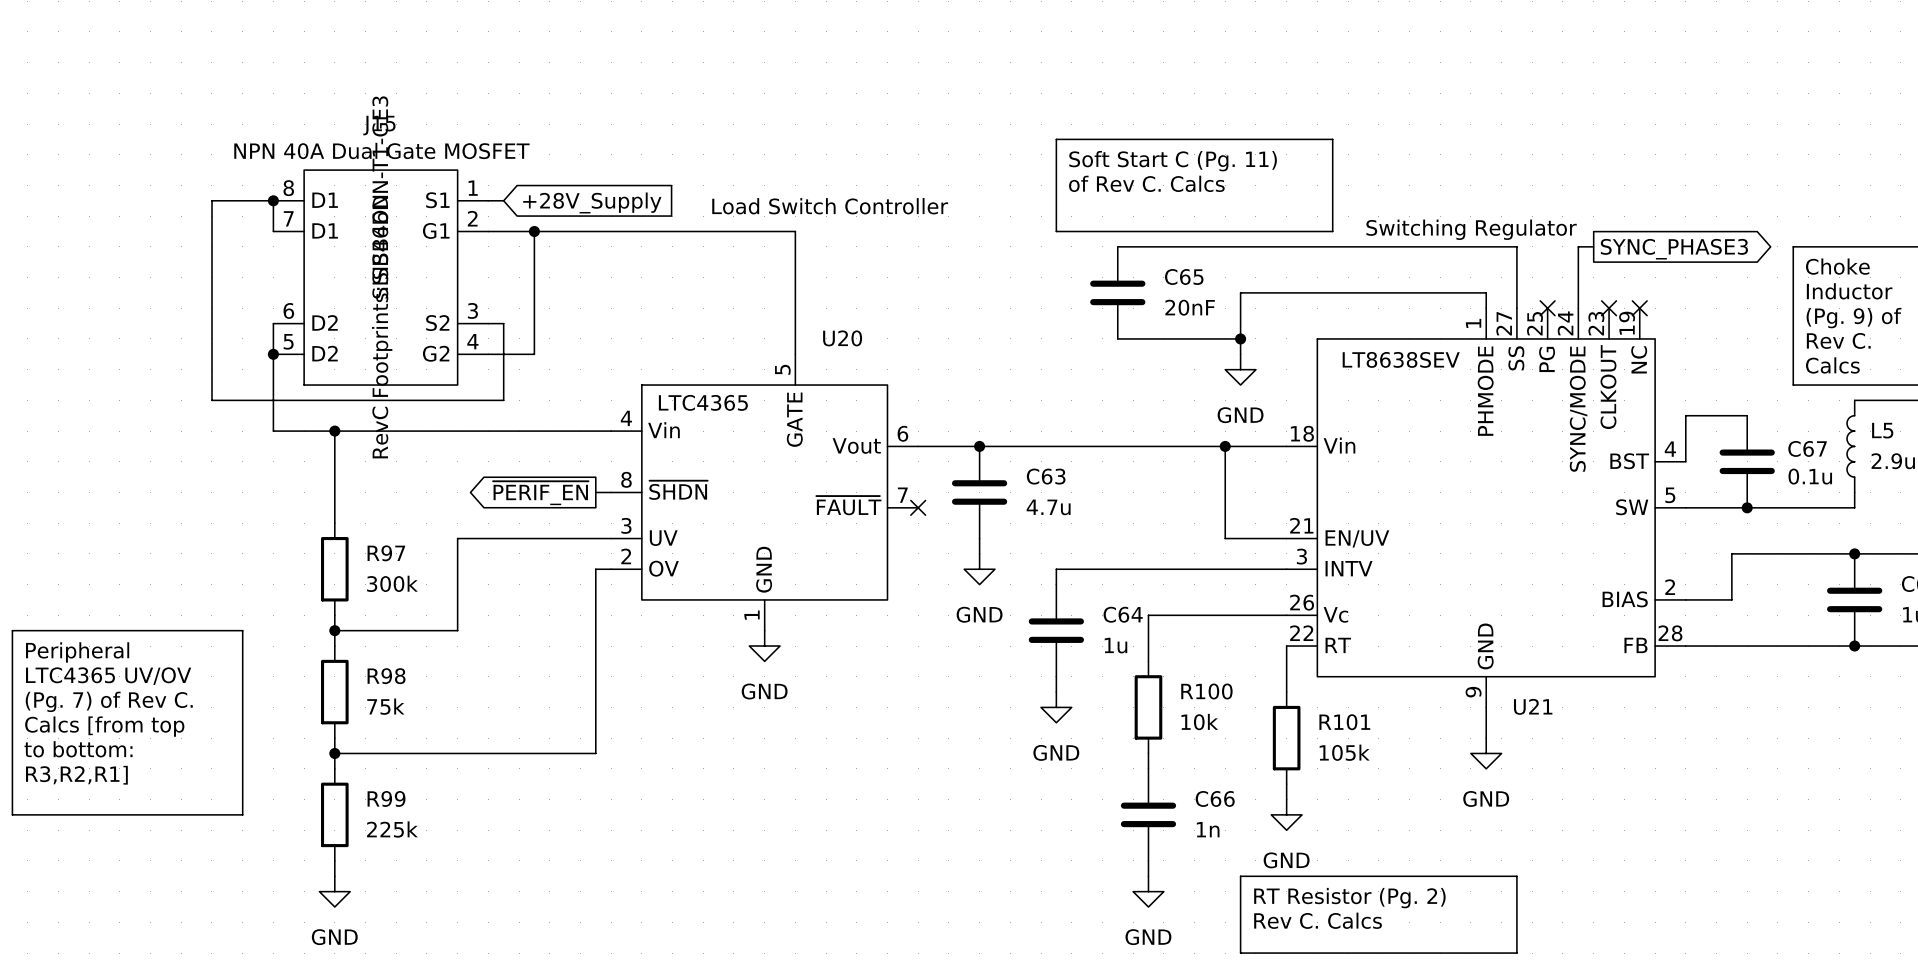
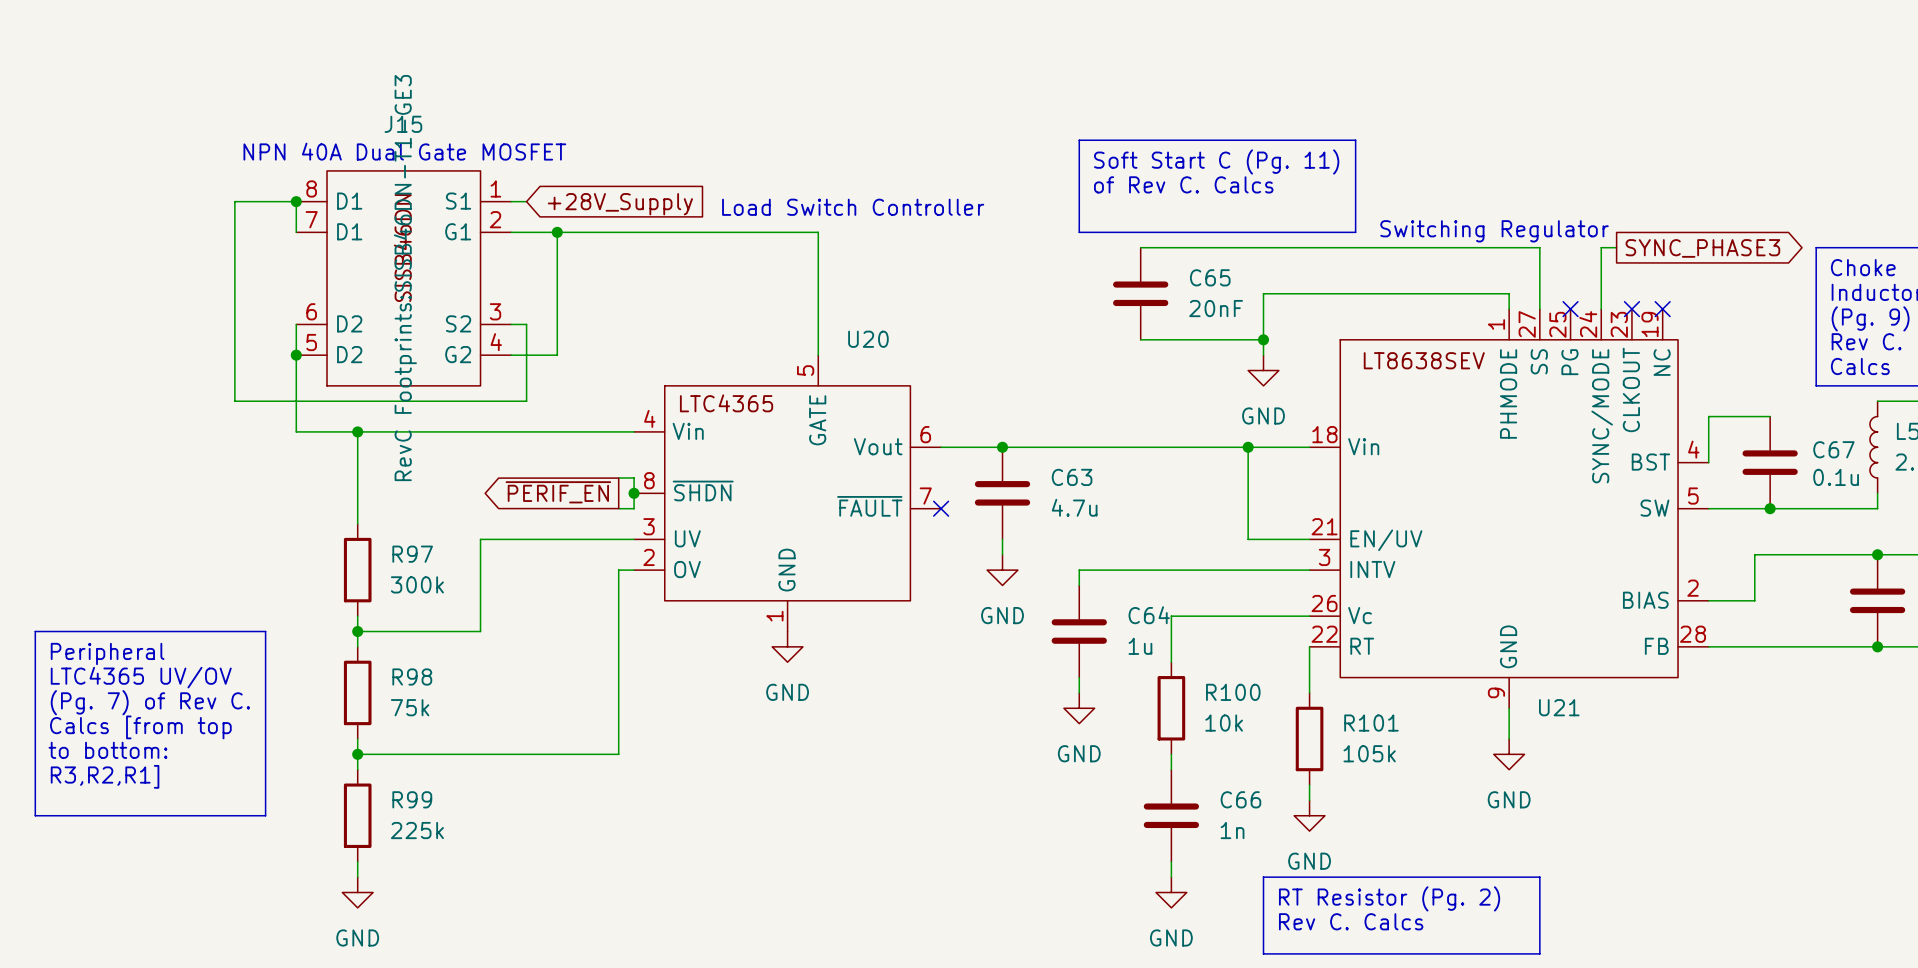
wire: none -> (618, 477) (634, 477) (634, 508) (618, 508)
wire: (595, 492) (611, 492) -> none
junction: none -> (634, 493)

